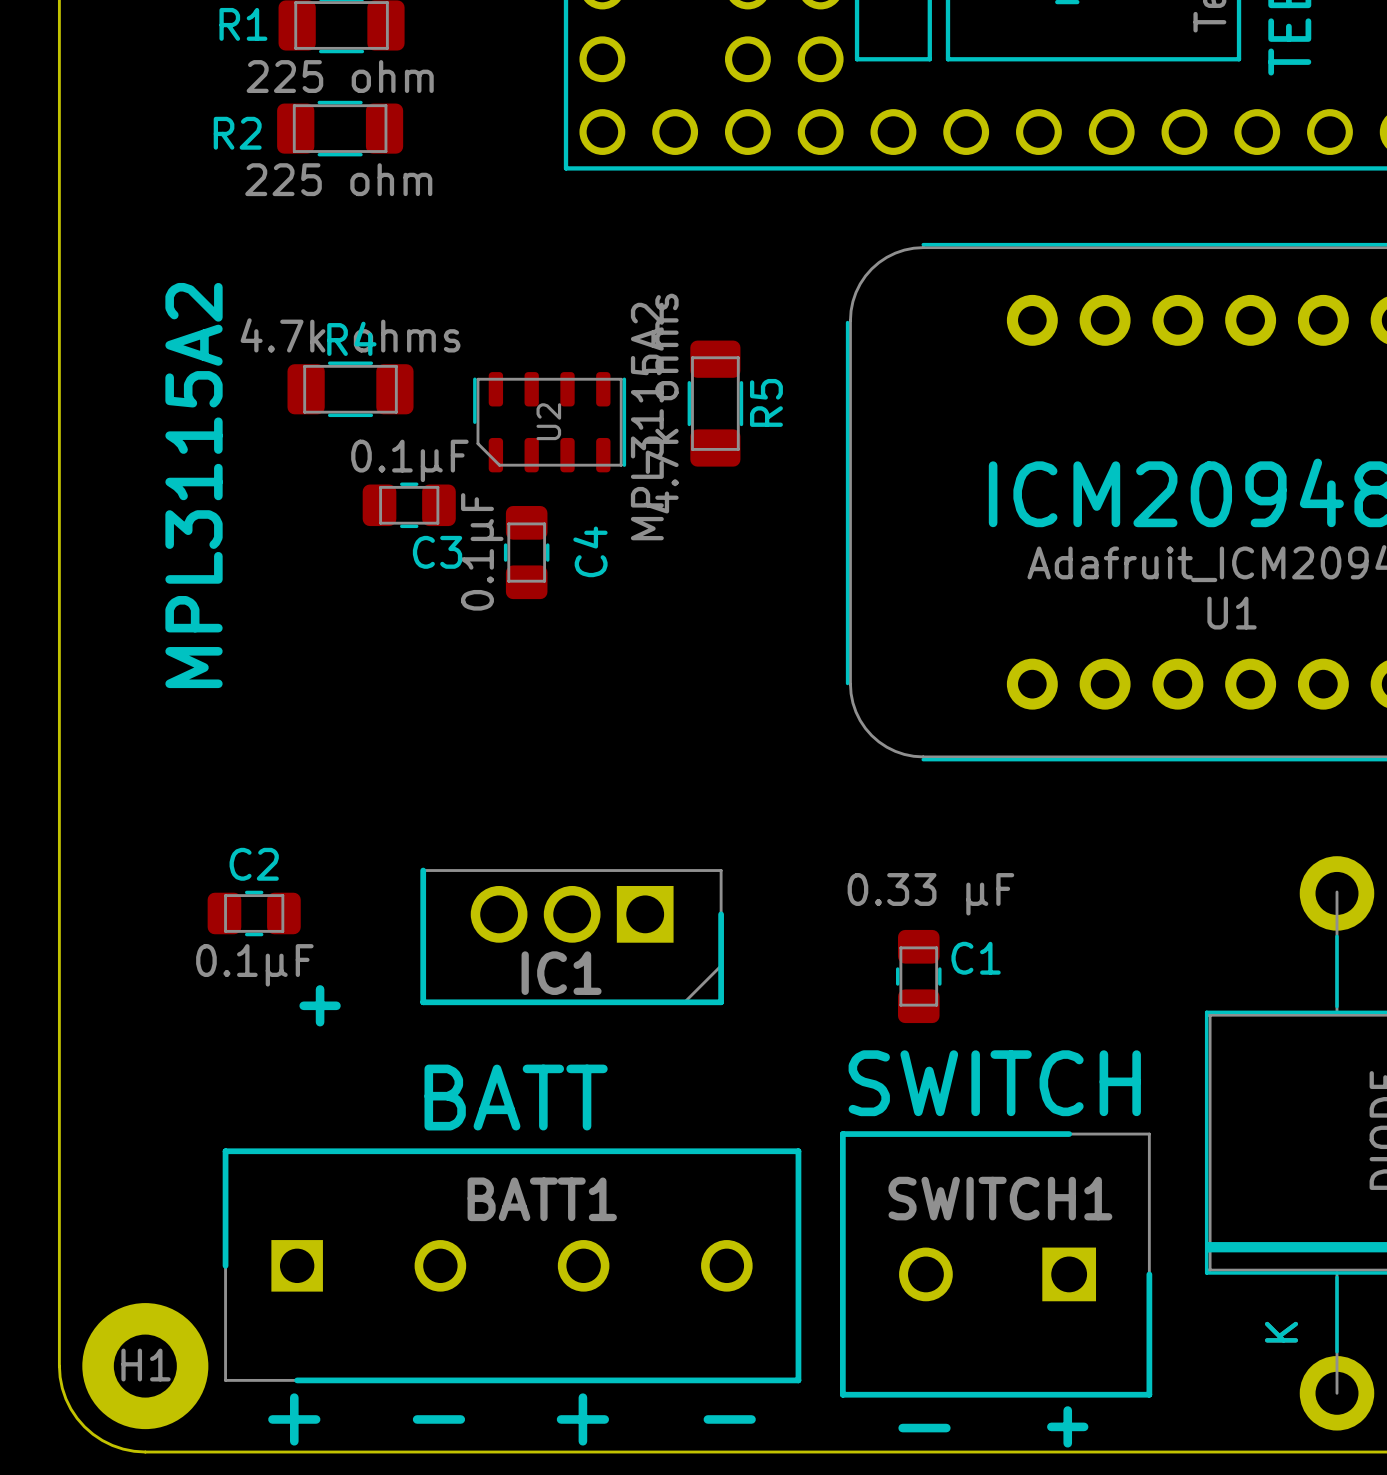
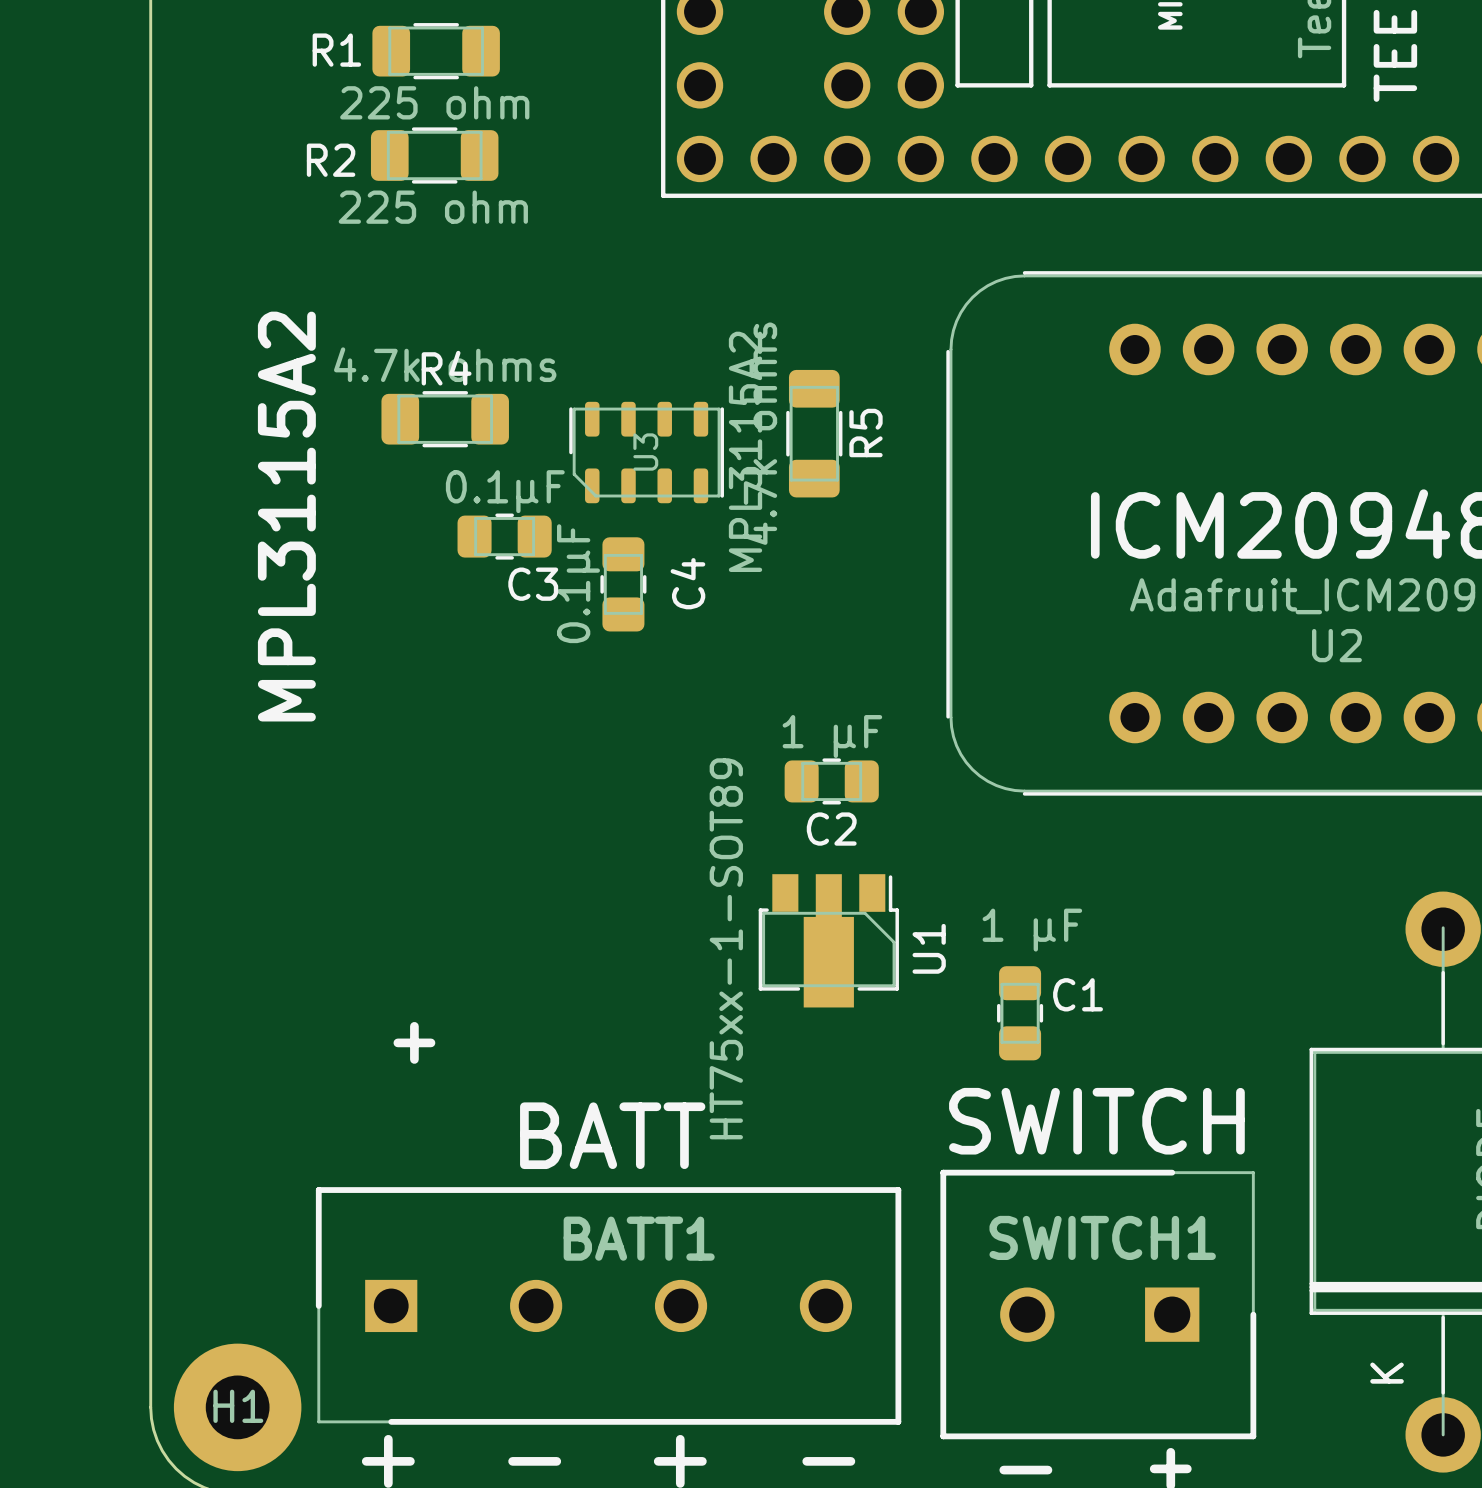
U2 name: U2 (548, 421) -> U3 (645, 452)
U1 name: U1 (1232, 613) -> U2 (1336, 645)
C2 name position: C2 (254, 864) -> C2 (831, 829)
C1 value: 0.33 µF (930, 894) -> 1 µF (1032, 930)
U1: none -> HT75xx-1-SOT89 (828, 940)
C2 position: (254, 913) -> (831, 781)
IC1: (572, 936) -> none
C2 value: 0.1µF (254, 965) -> 1 µF (832, 736)

